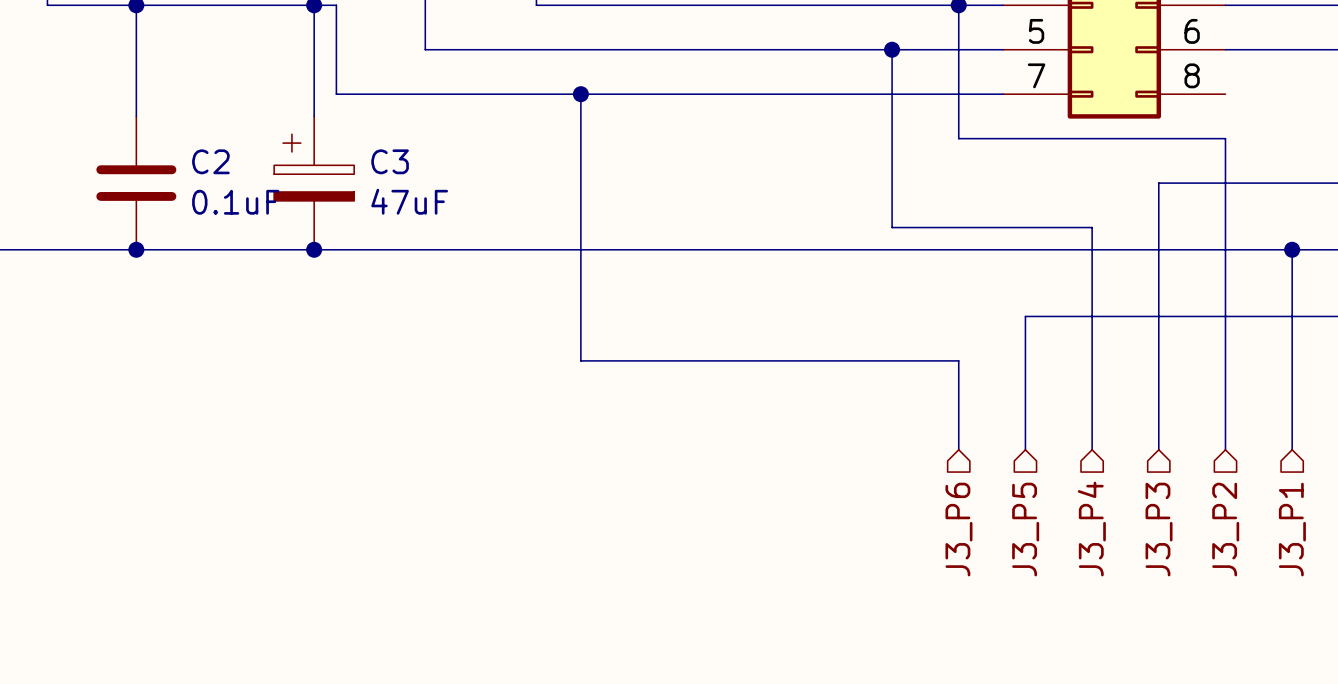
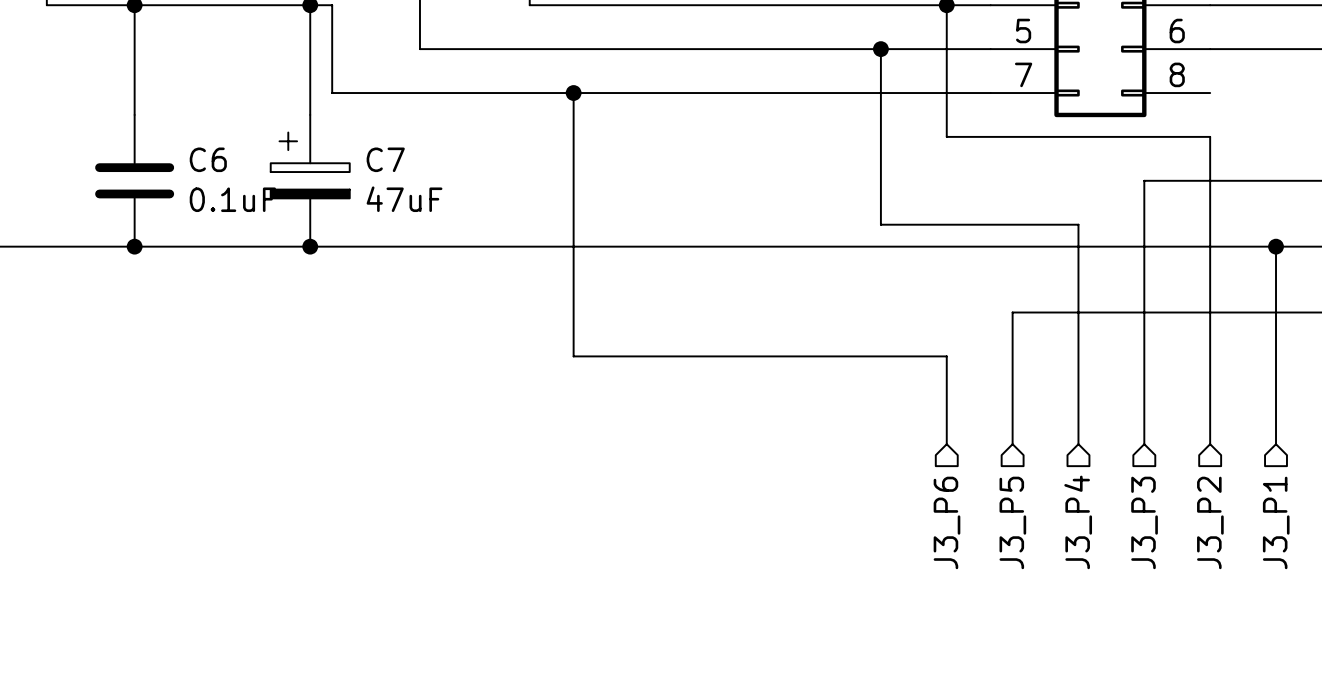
C2 name: C2 (210, 161) -> C6 (208, 159)
C3 name: C3 (390, 161) -> C7 (385, 159)

